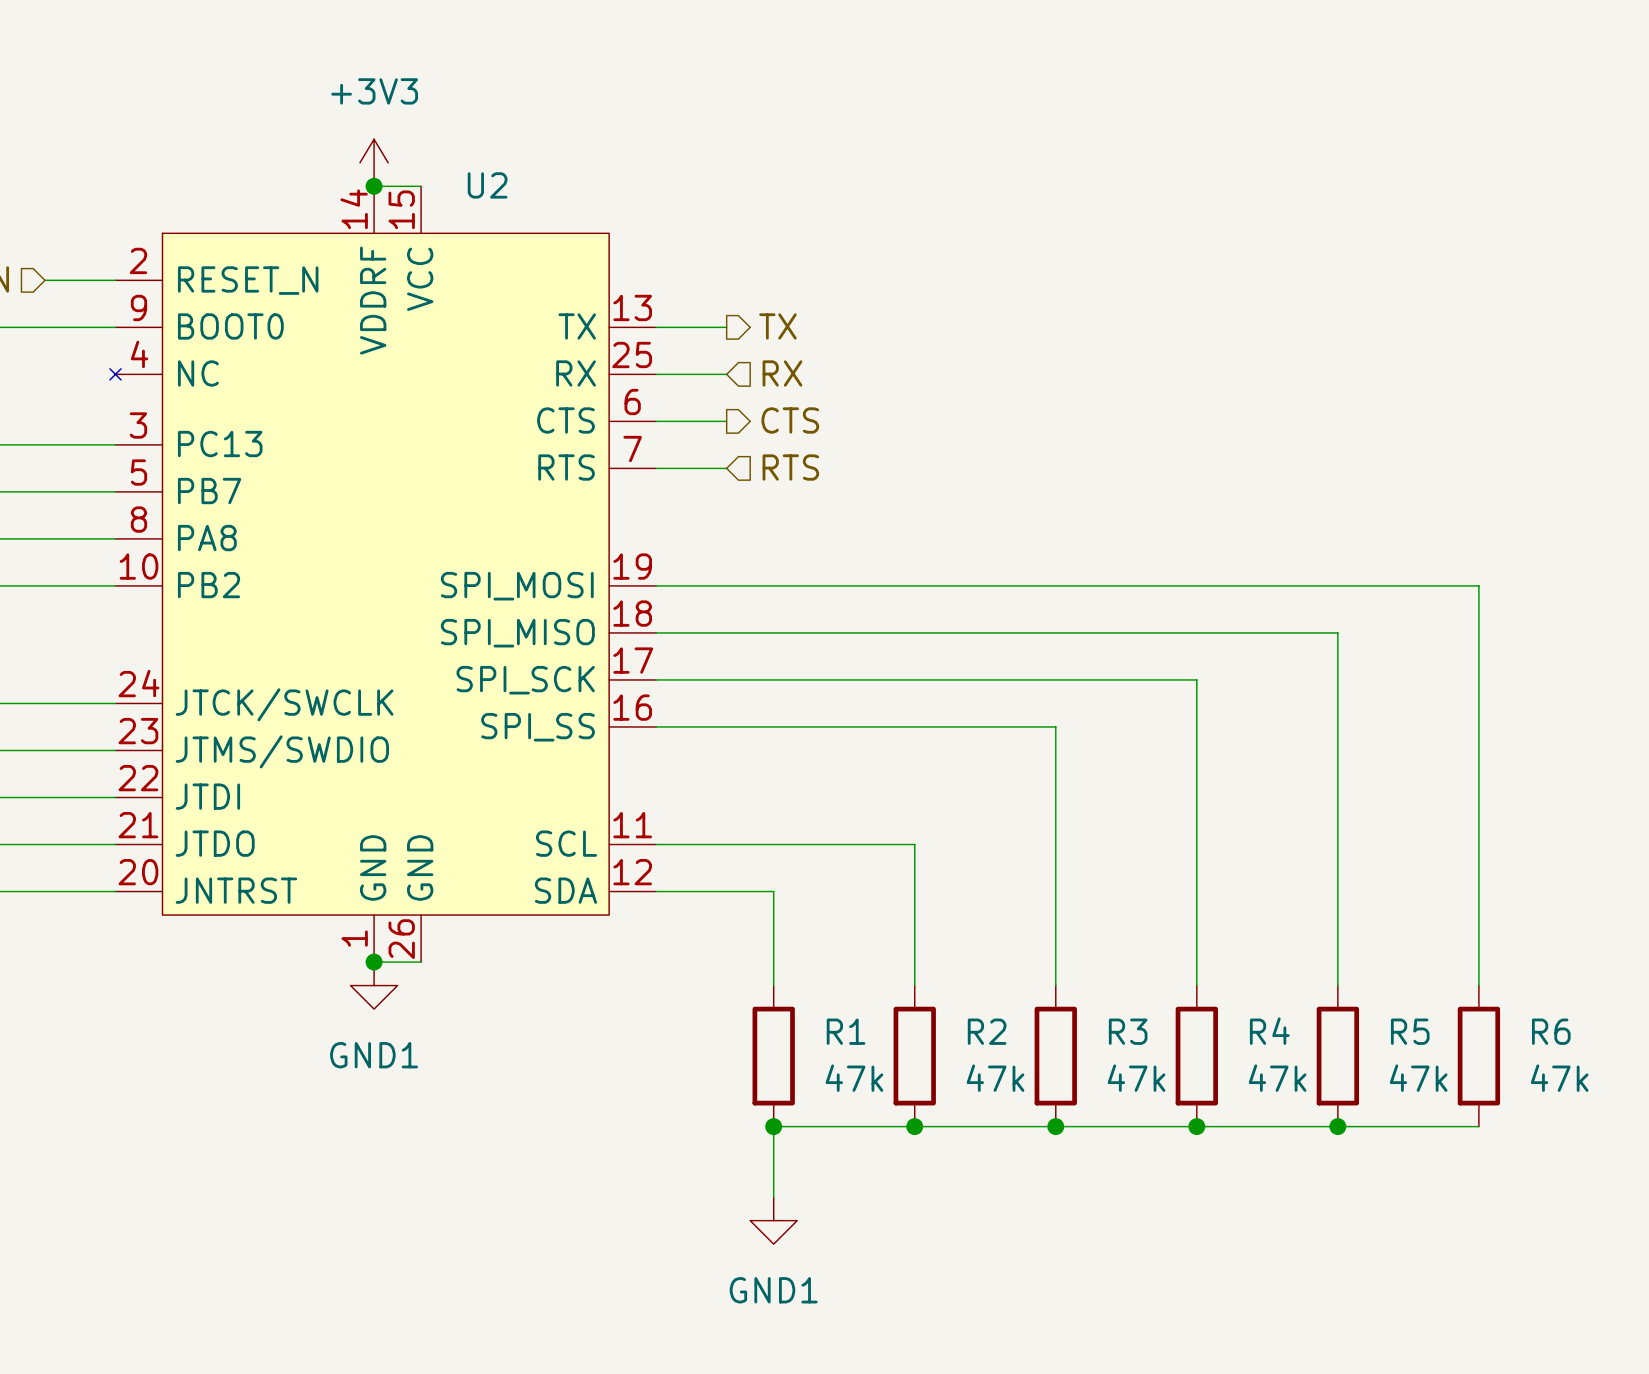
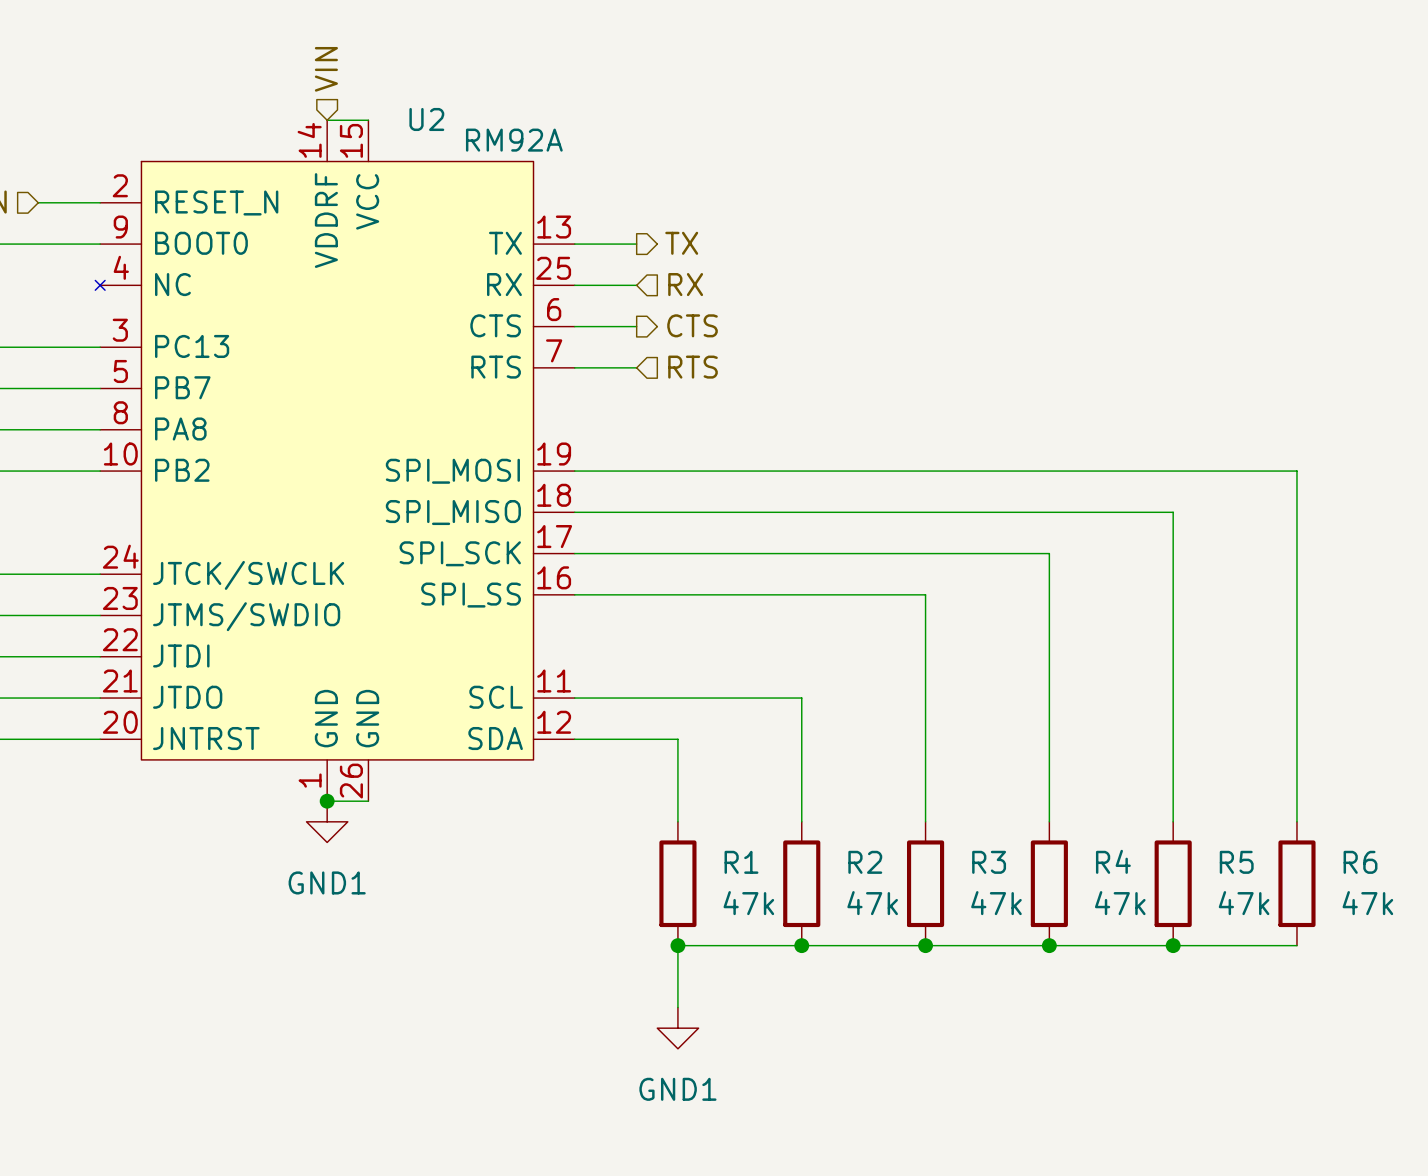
hierarchical label: none -> VIN (326, 69)
power symbol: +3V3 (374, 162) -> none
junction: (374, 186) -> none
U2 value: none -> RM92A (514, 140)

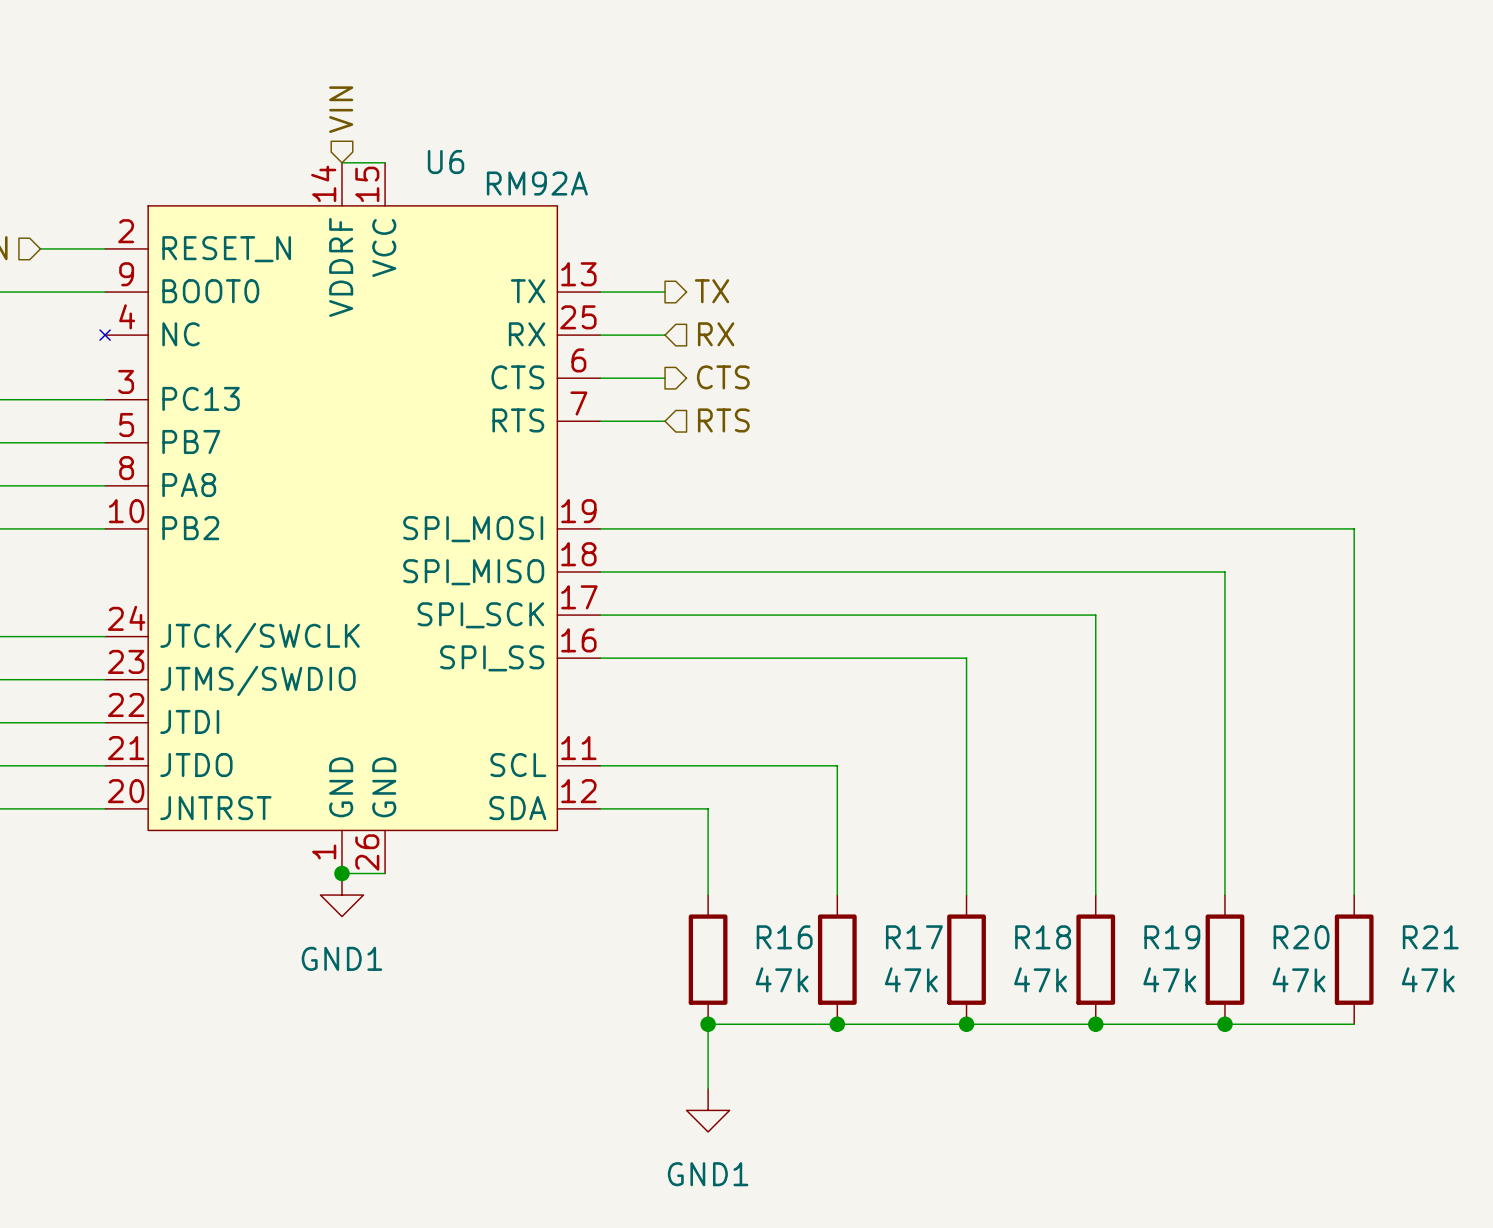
U2 name: U2 (426, 119) -> U6 (446, 162)
R4 name: R4 (1113, 861) -> R19 (1172, 937)
R1 name: R1 (741, 862) -> R16 (784, 937)
R2 name: R2 (865, 862) -> R17 (914, 937)
R3 name: R3 (989, 862) -> R18 (1043, 937)
R5 name: R5 (1236, 862) -> R20 (1301, 937)
R6 name: R6 (1360, 862) -> R21 (1430, 937)

